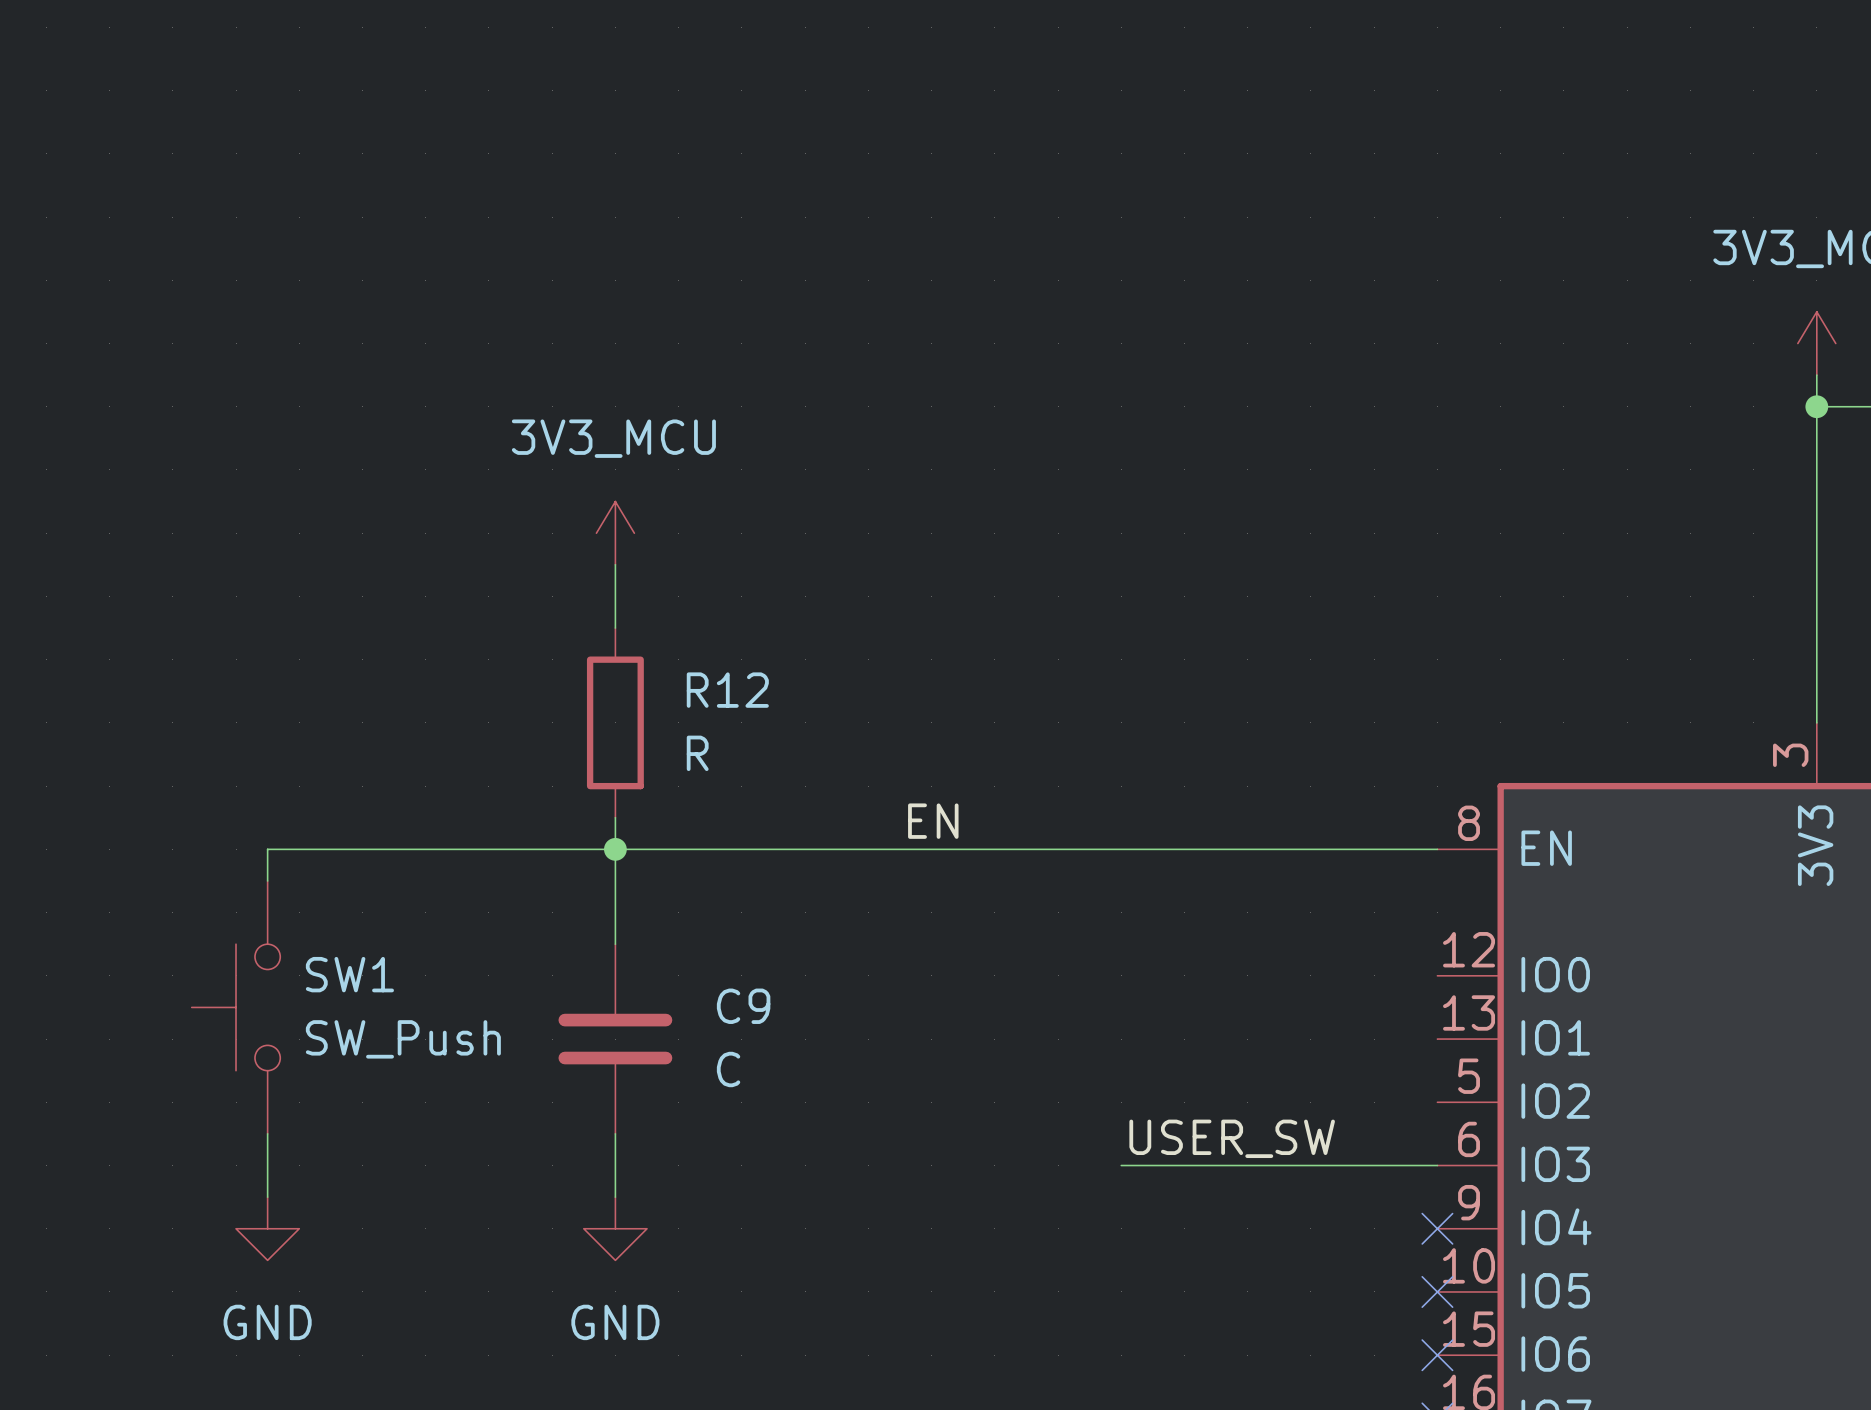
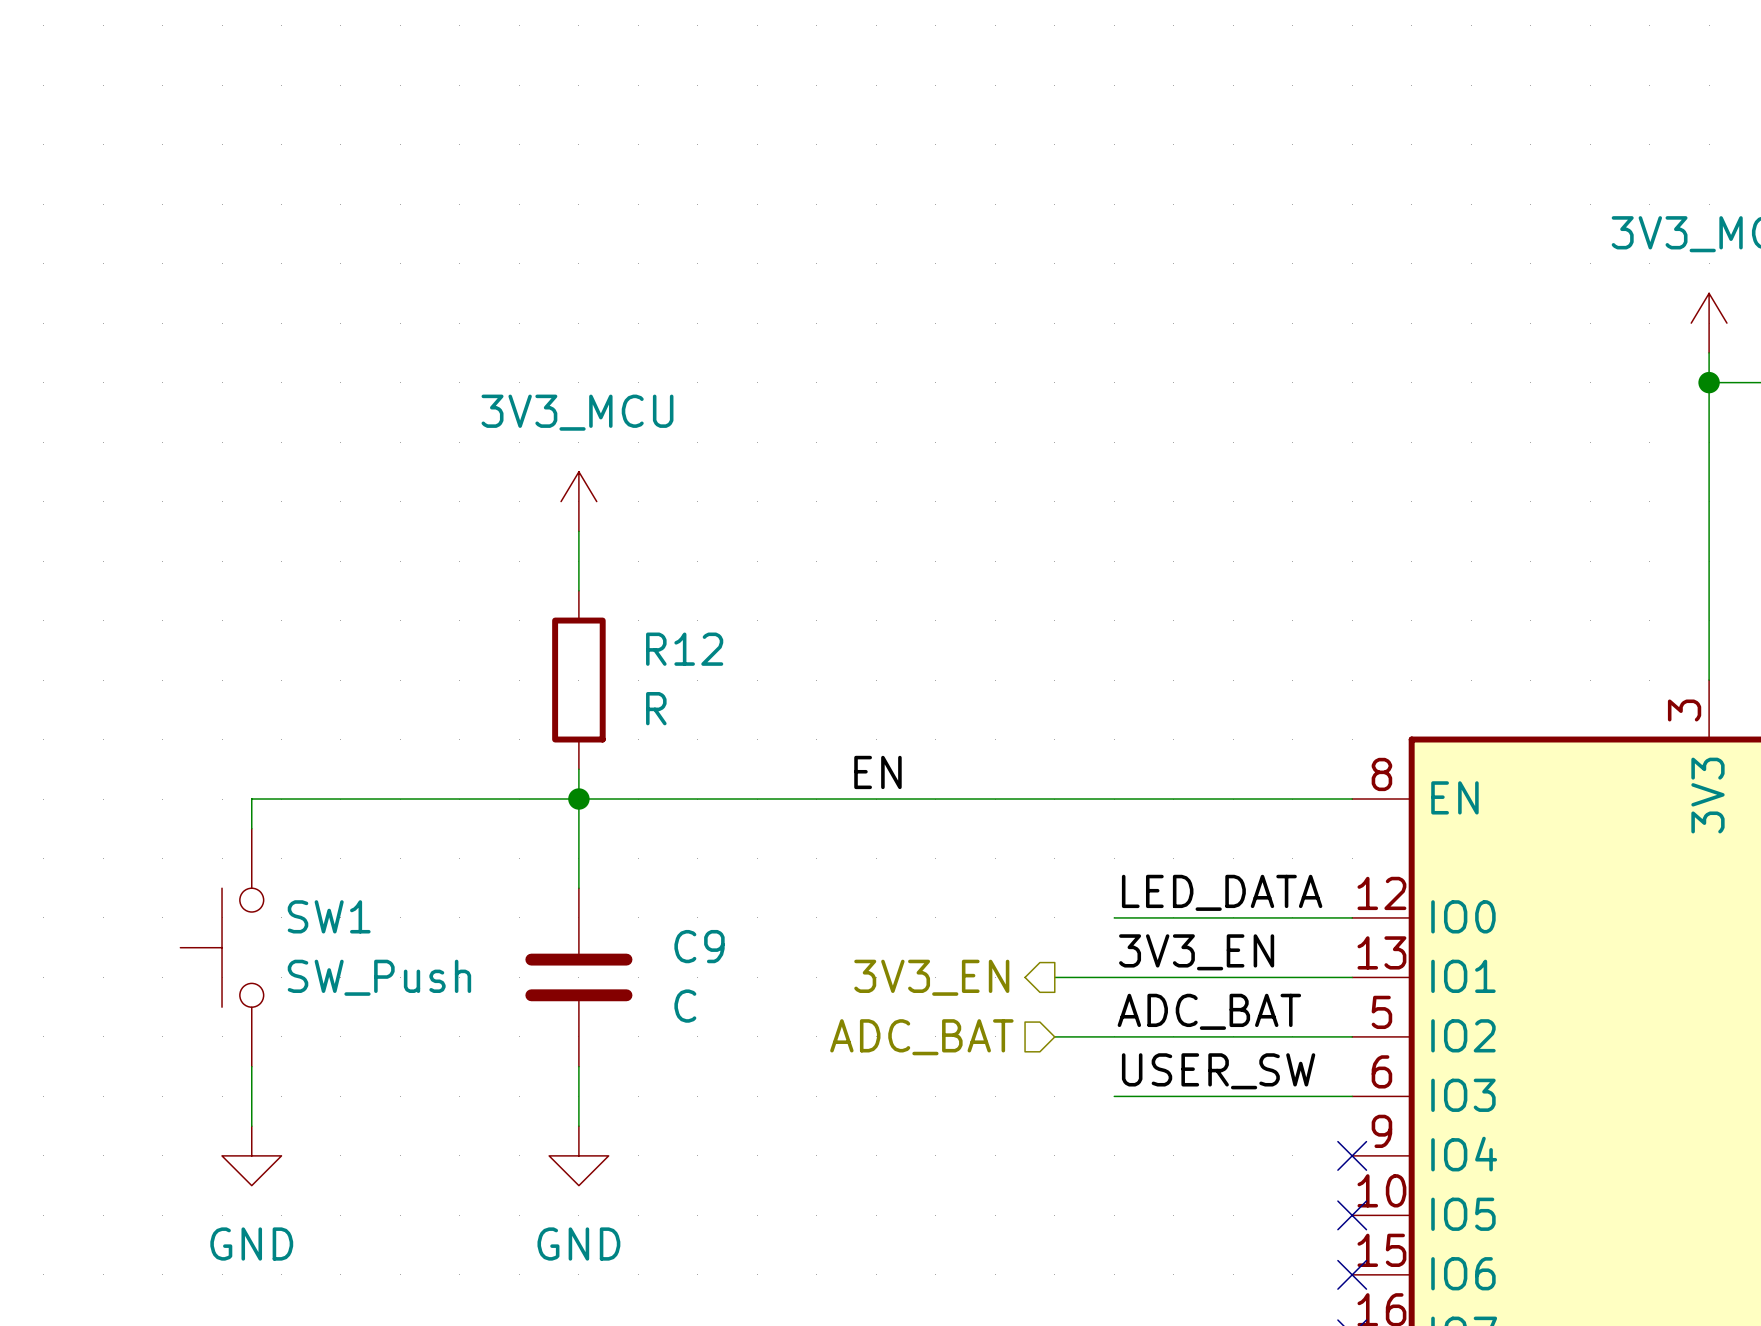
label: none -> LED_DATA (1222, 892)
wire: none -> (1114, 917) (1352, 917)
label: none -> 3V3_EN (1196, 952)
hierarchical label: none -> 3V3_EN (931, 977)
wire: none -> (1054, 977) (1352, 977)
label: none -> ADC_BAT (1209, 1011)
hierarchical label: none -> ADC_BAT (921, 1037)
wire: none -> (1054, 1036) (1352, 1036)
label position: USER_SW (1232, 1138) -> USER_SW (1218, 1071)
wire: (1121, 1165) (1184, 1165) -> none

